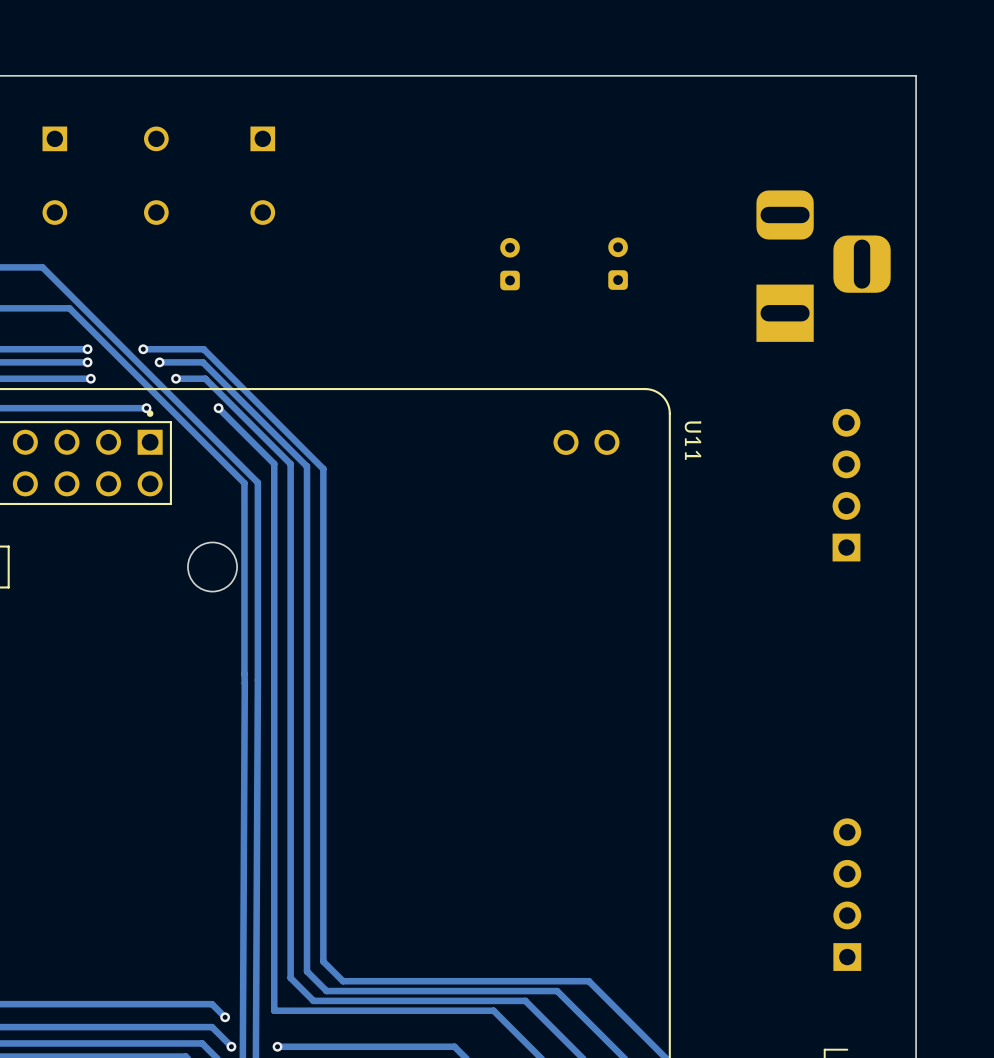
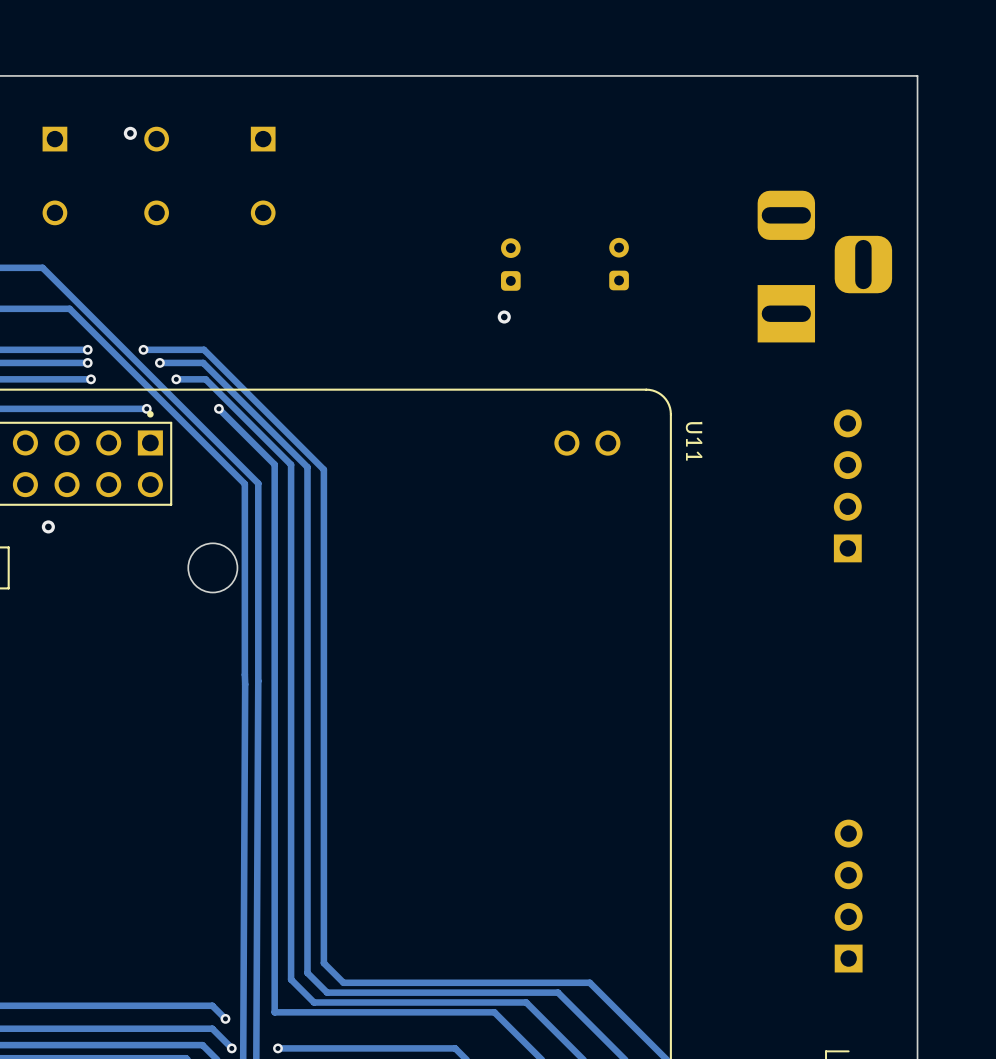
via: none -> (130, 133)
via: none -> (504, 317)
via: none -> (48, 526)

